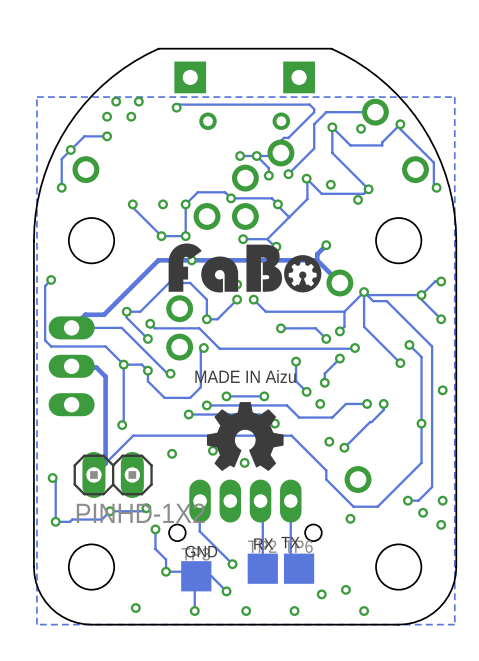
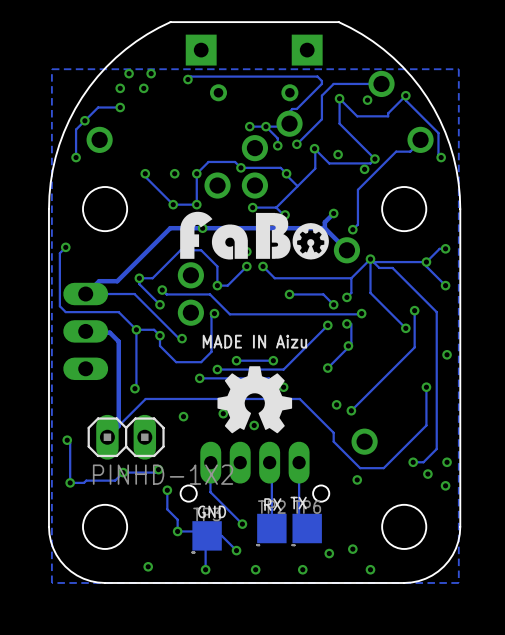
track: none -> (420, 139) (410, 151) (396, 151) (357, 189) (357, 224) (352, 229)
via: none -> (352, 229)
track: (409, 344) (421, 357) (421, 423) -> none
track: (339, 358) (324, 373) (324, 382) -> none
track: none -> (351, 323) (351, 343) (327, 368)
via: none -> (327, 325)
track: (296, 361) (296, 381) (306, 391) -> none
via: (296, 361) -> none
via: none -> (348, 345)
via: (324, 382) -> none
via: (306, 391) -> none
track: (367, 403) (345, 403) (332, 417) (299, 417) (286, 405) (274, 405) -> (327, 325) (283, 369)
via: (367, 403) -> none
track: (383, 403) (383, 409) (370, 422) -> (414, 315) (414, 347) (376, 385)
via: (383, 403) -> none

